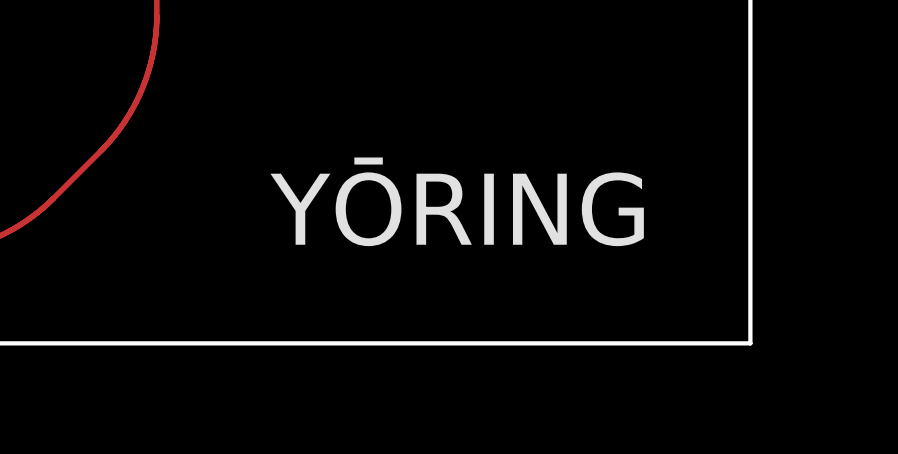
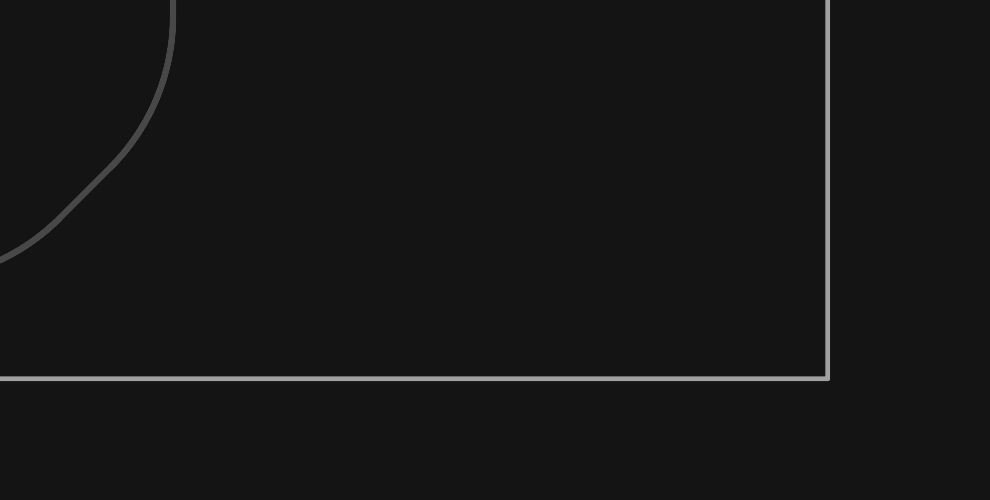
text: YŌRING (457, 201) -> none

